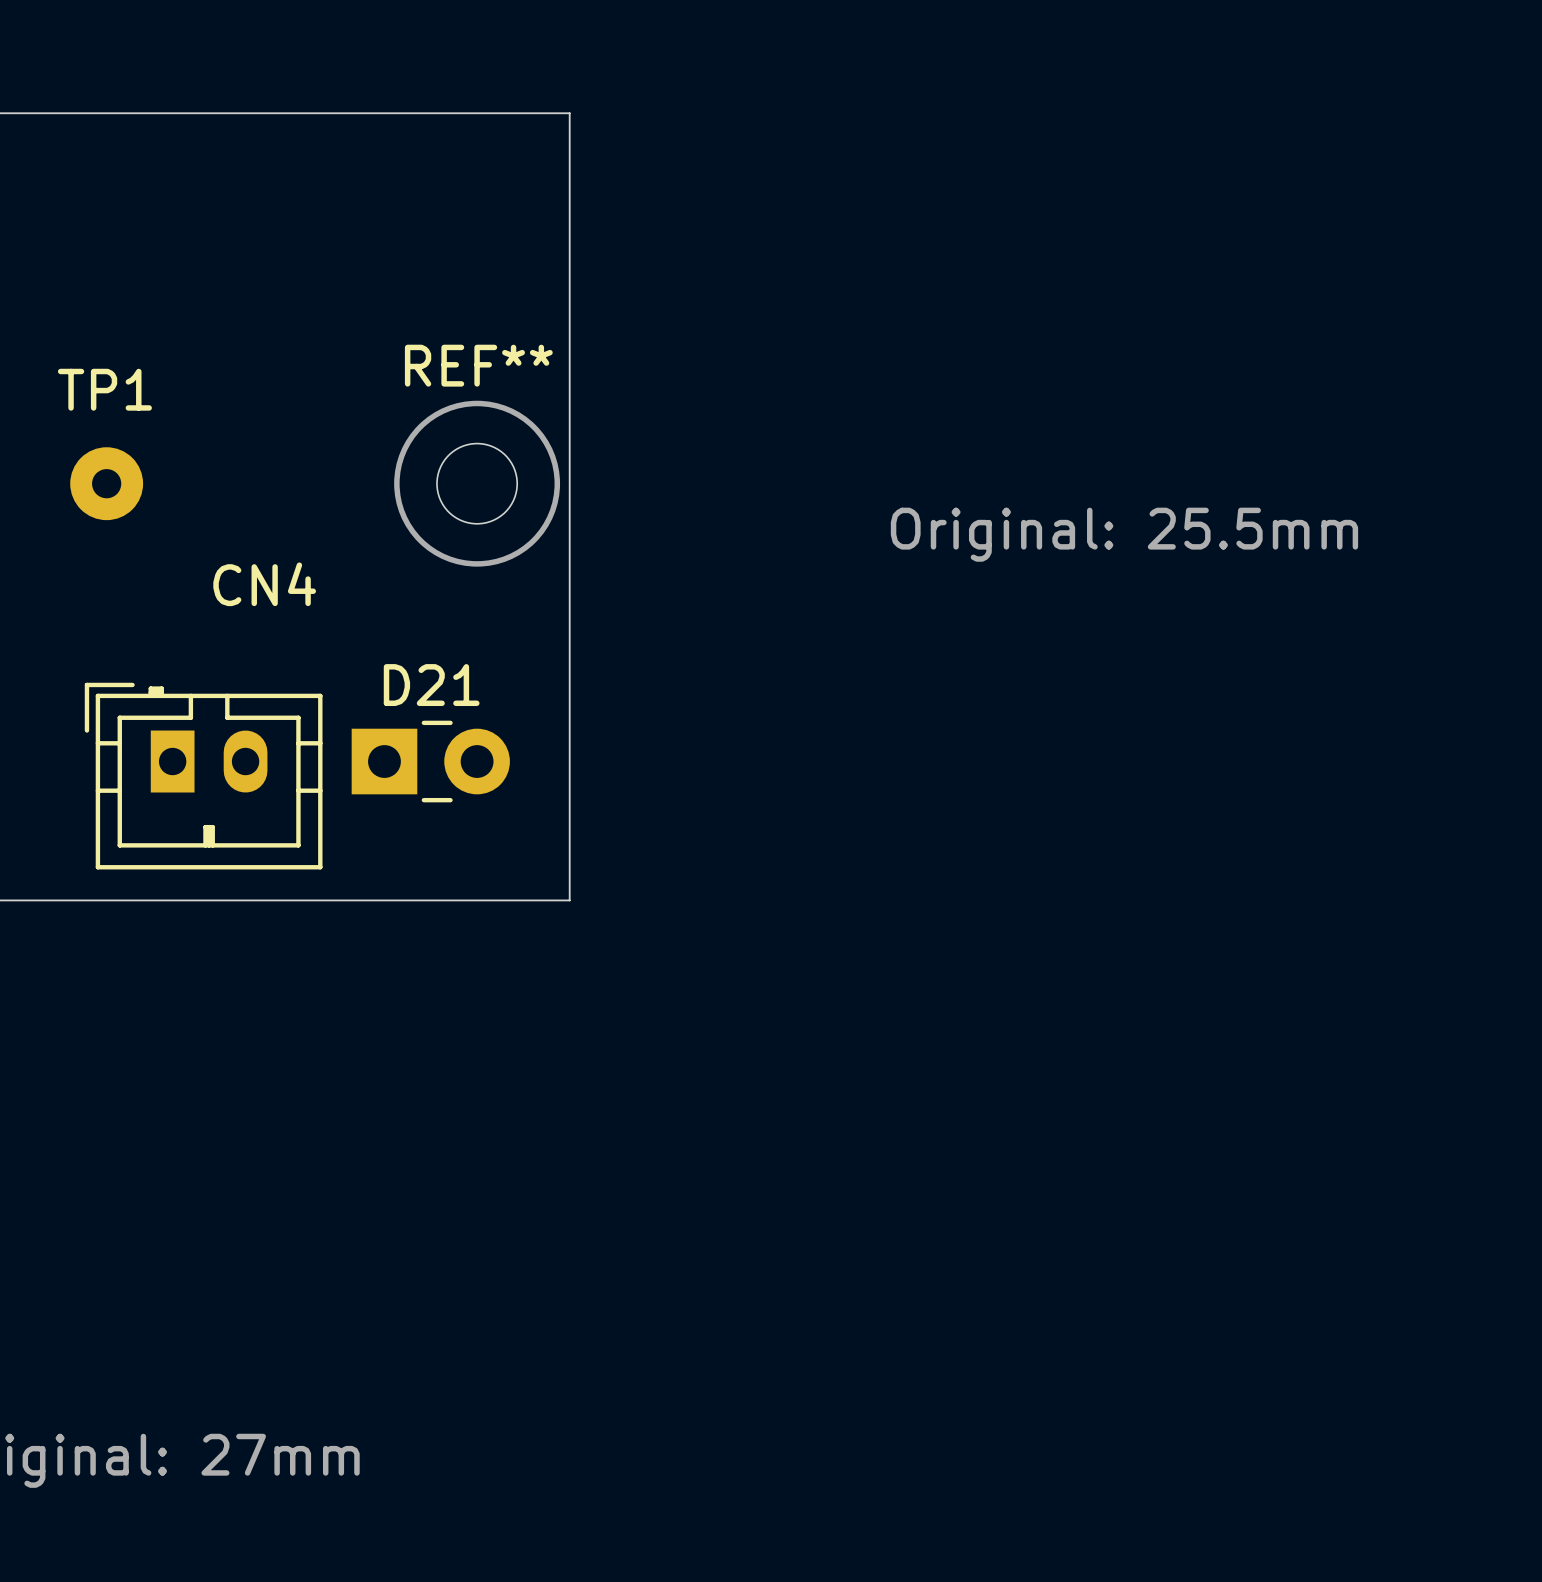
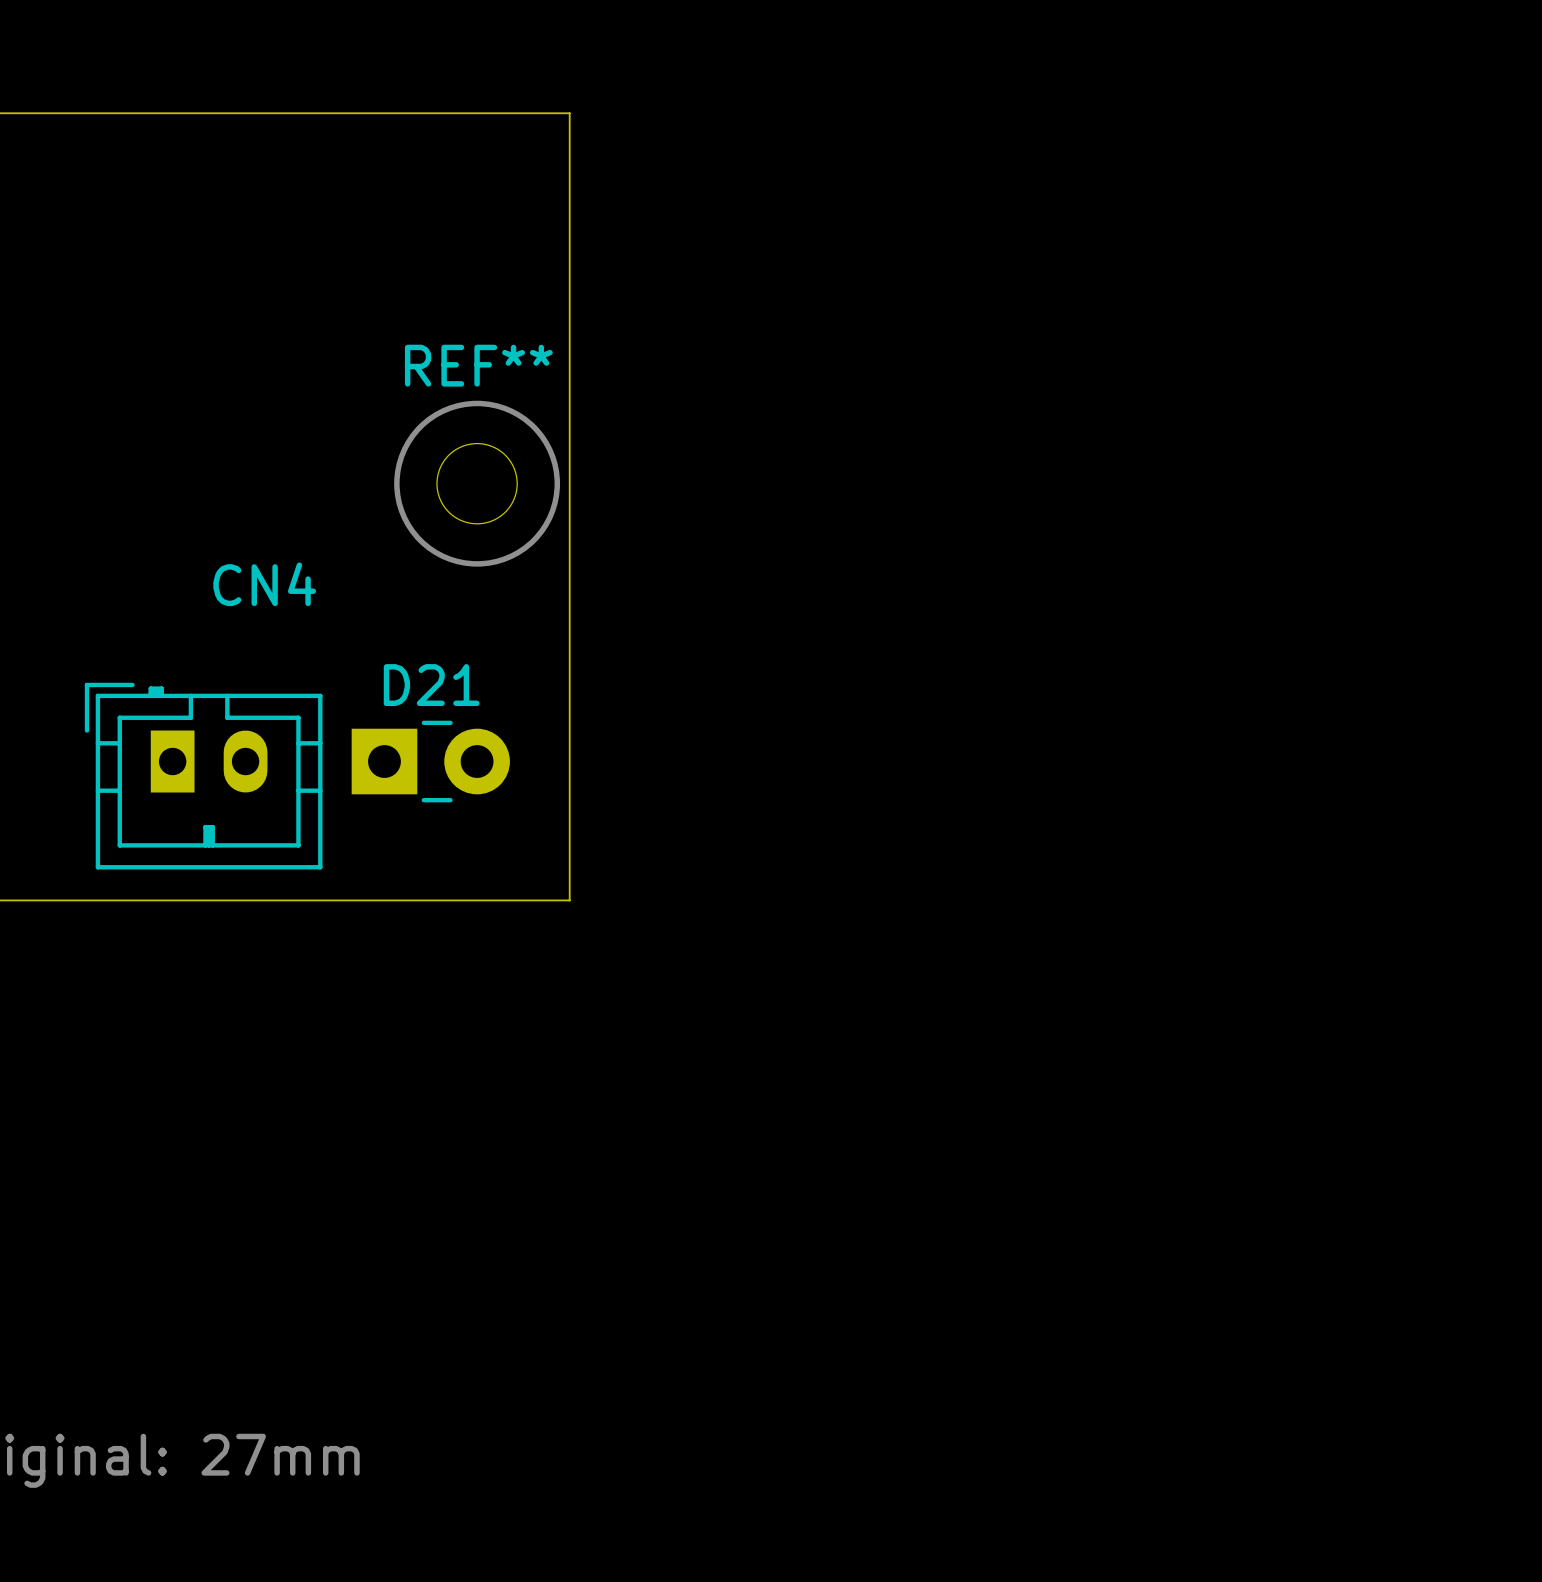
TP1: (106, 483) -> none
text: Original: 25.5mm (1124, 534) -> none

